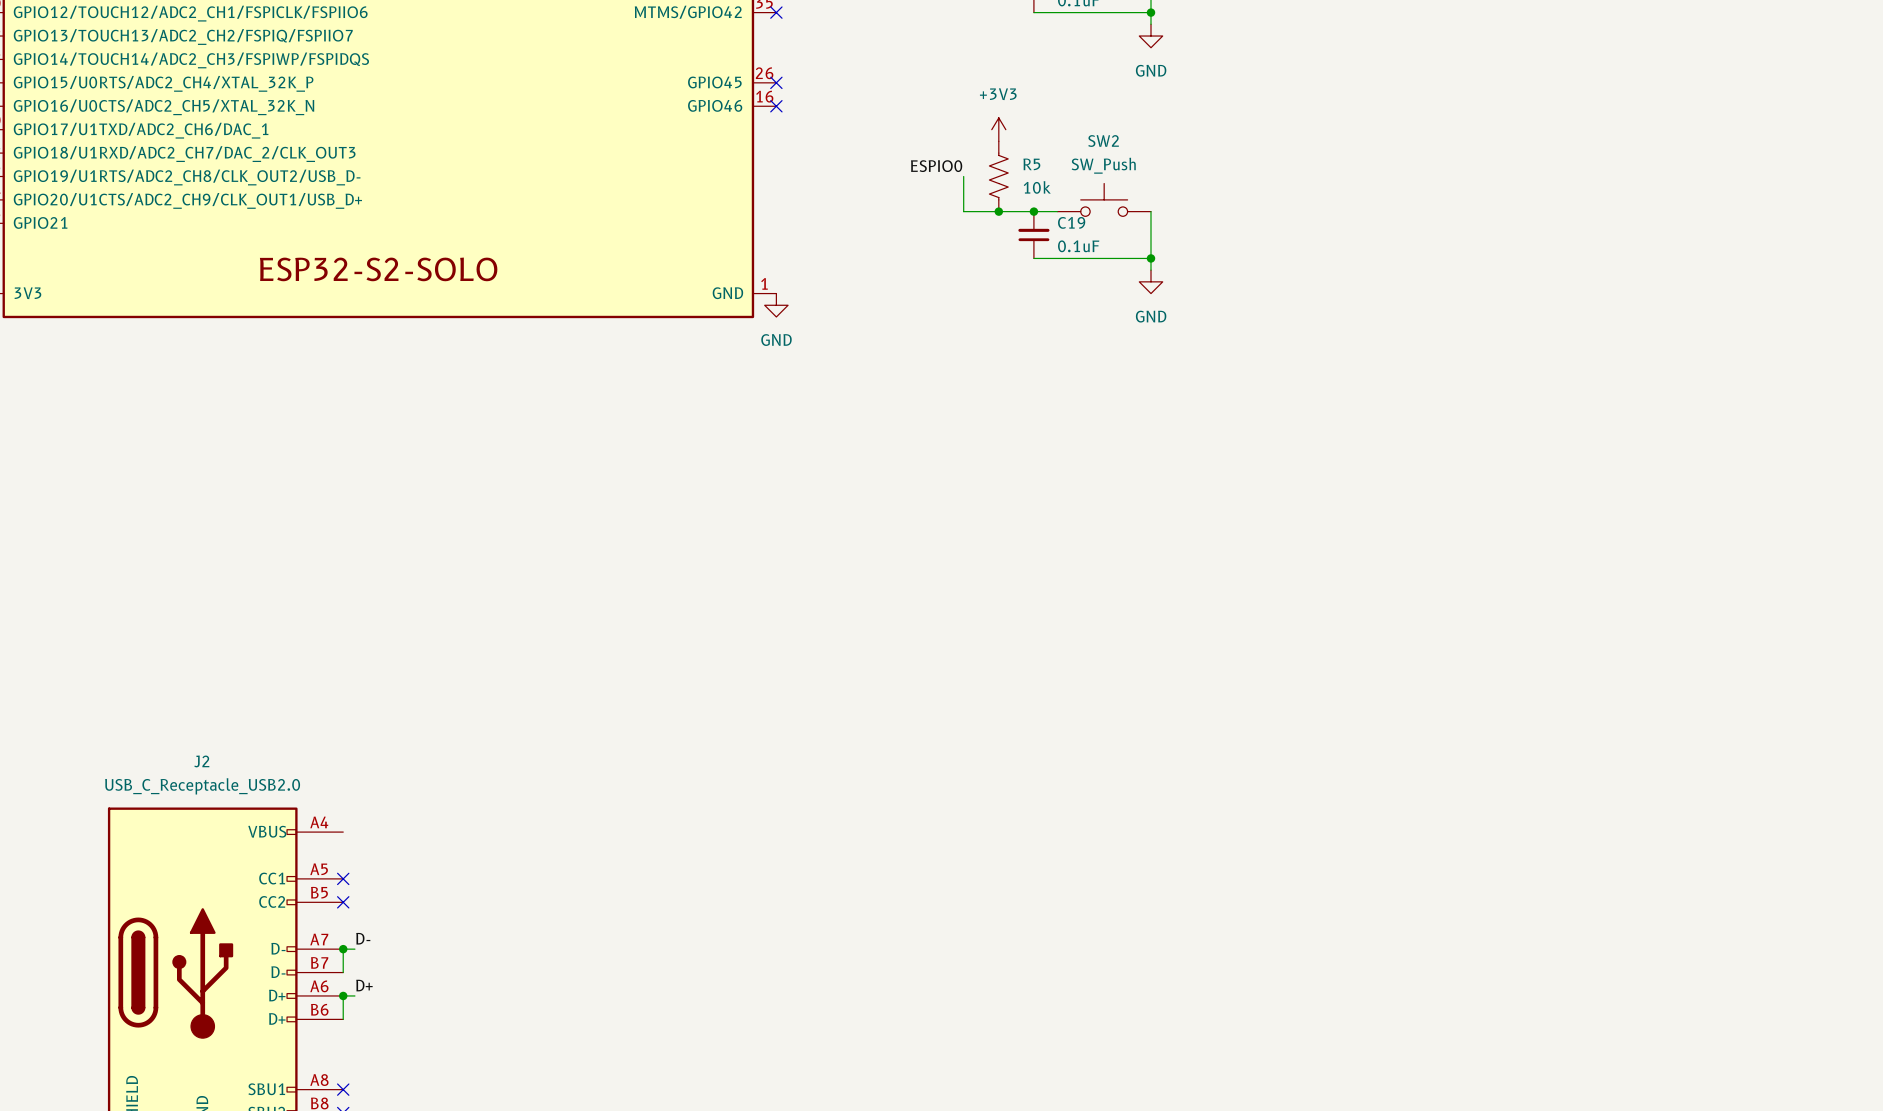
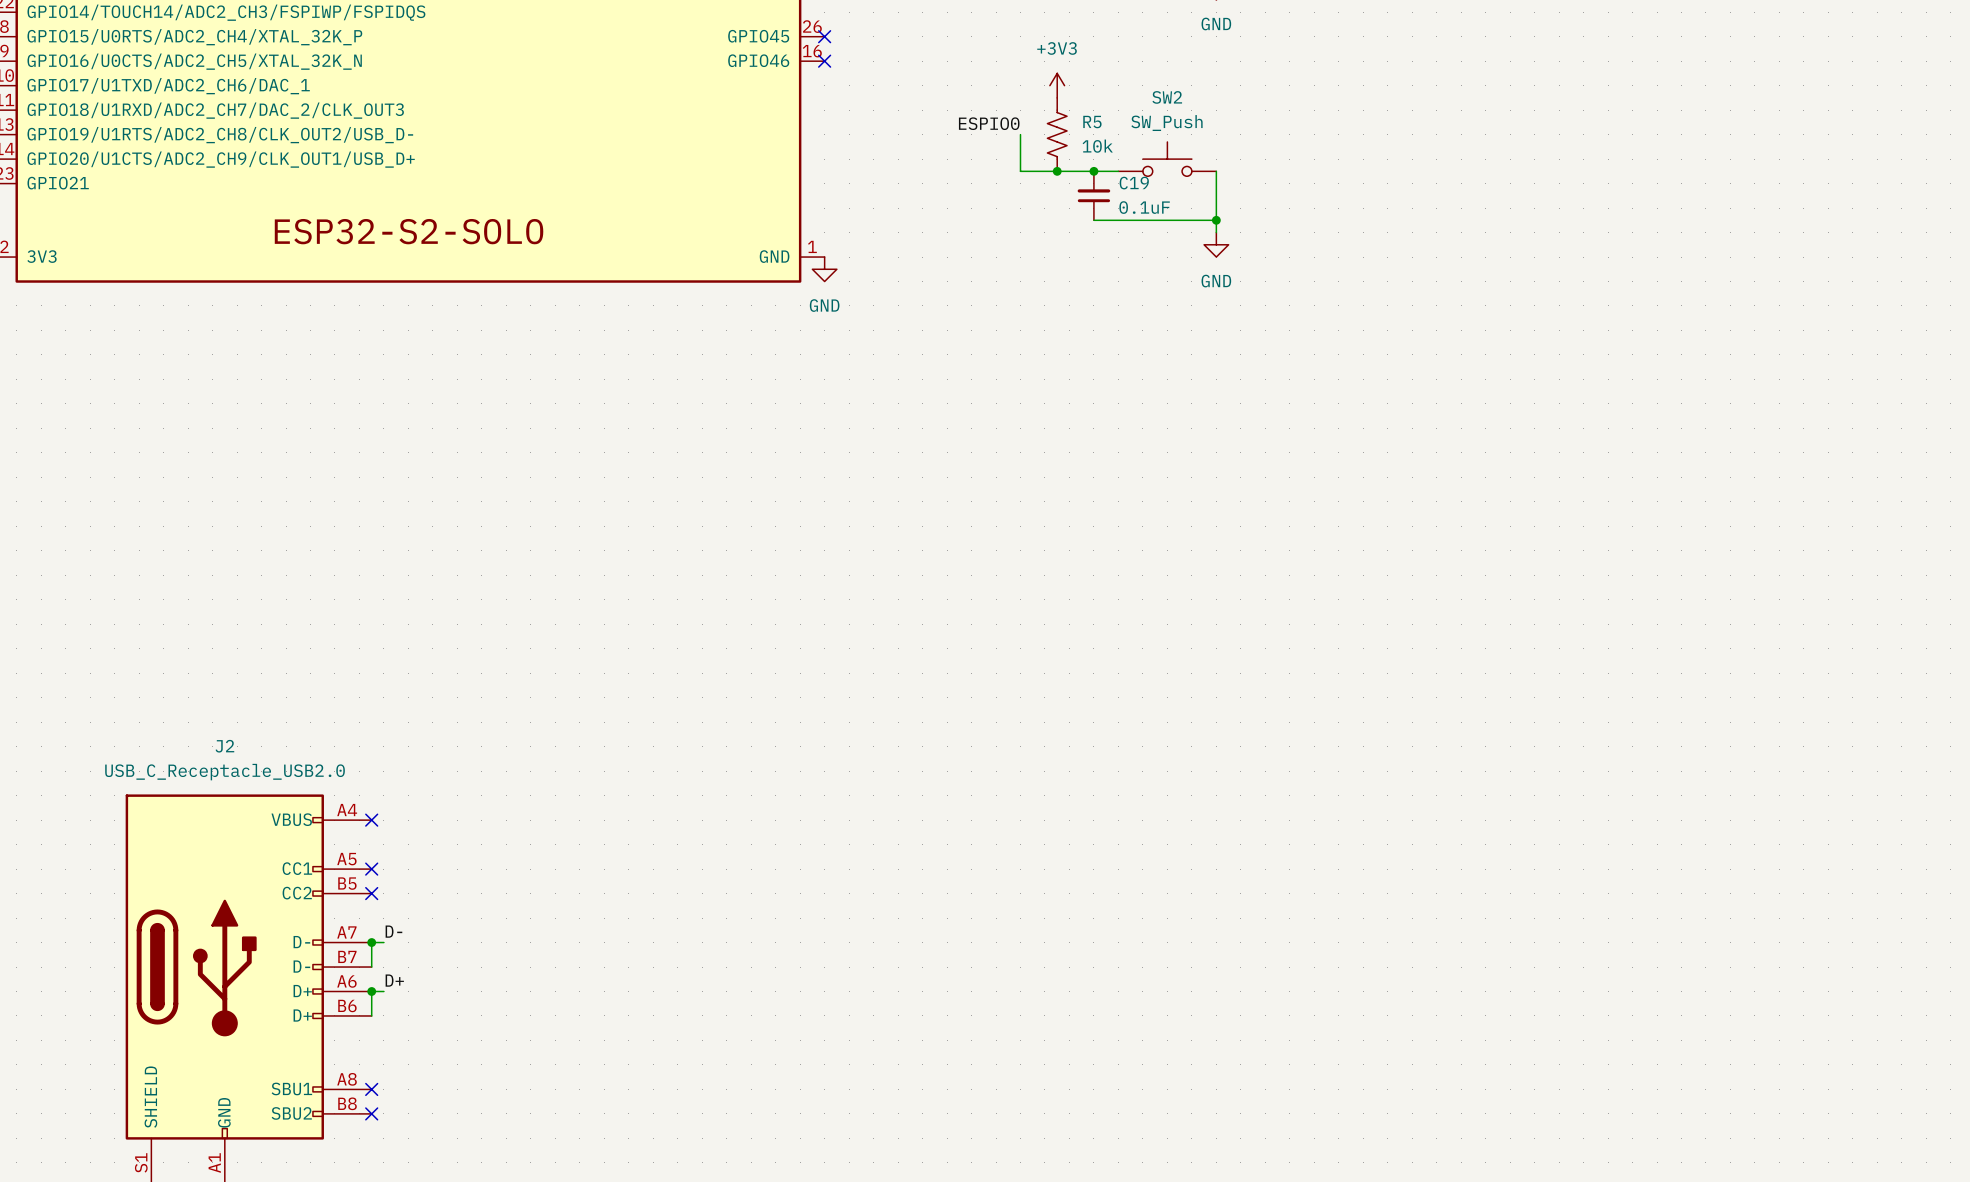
no-connect mark: none -> (371, 820)

